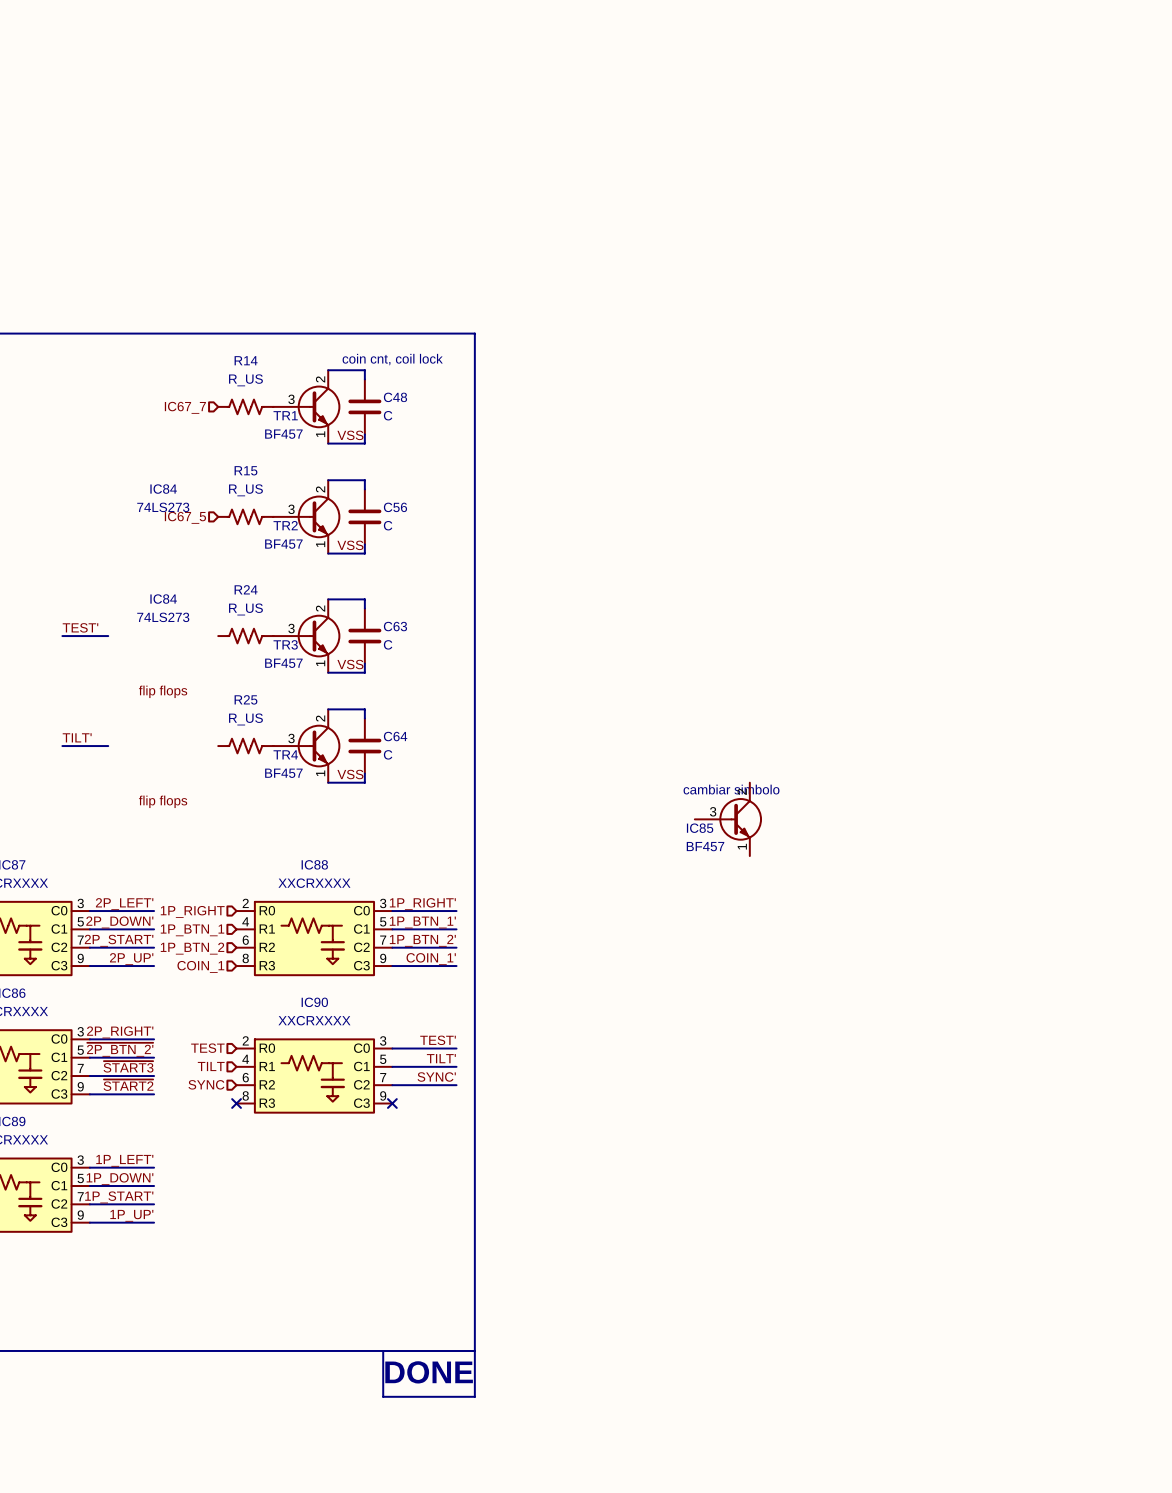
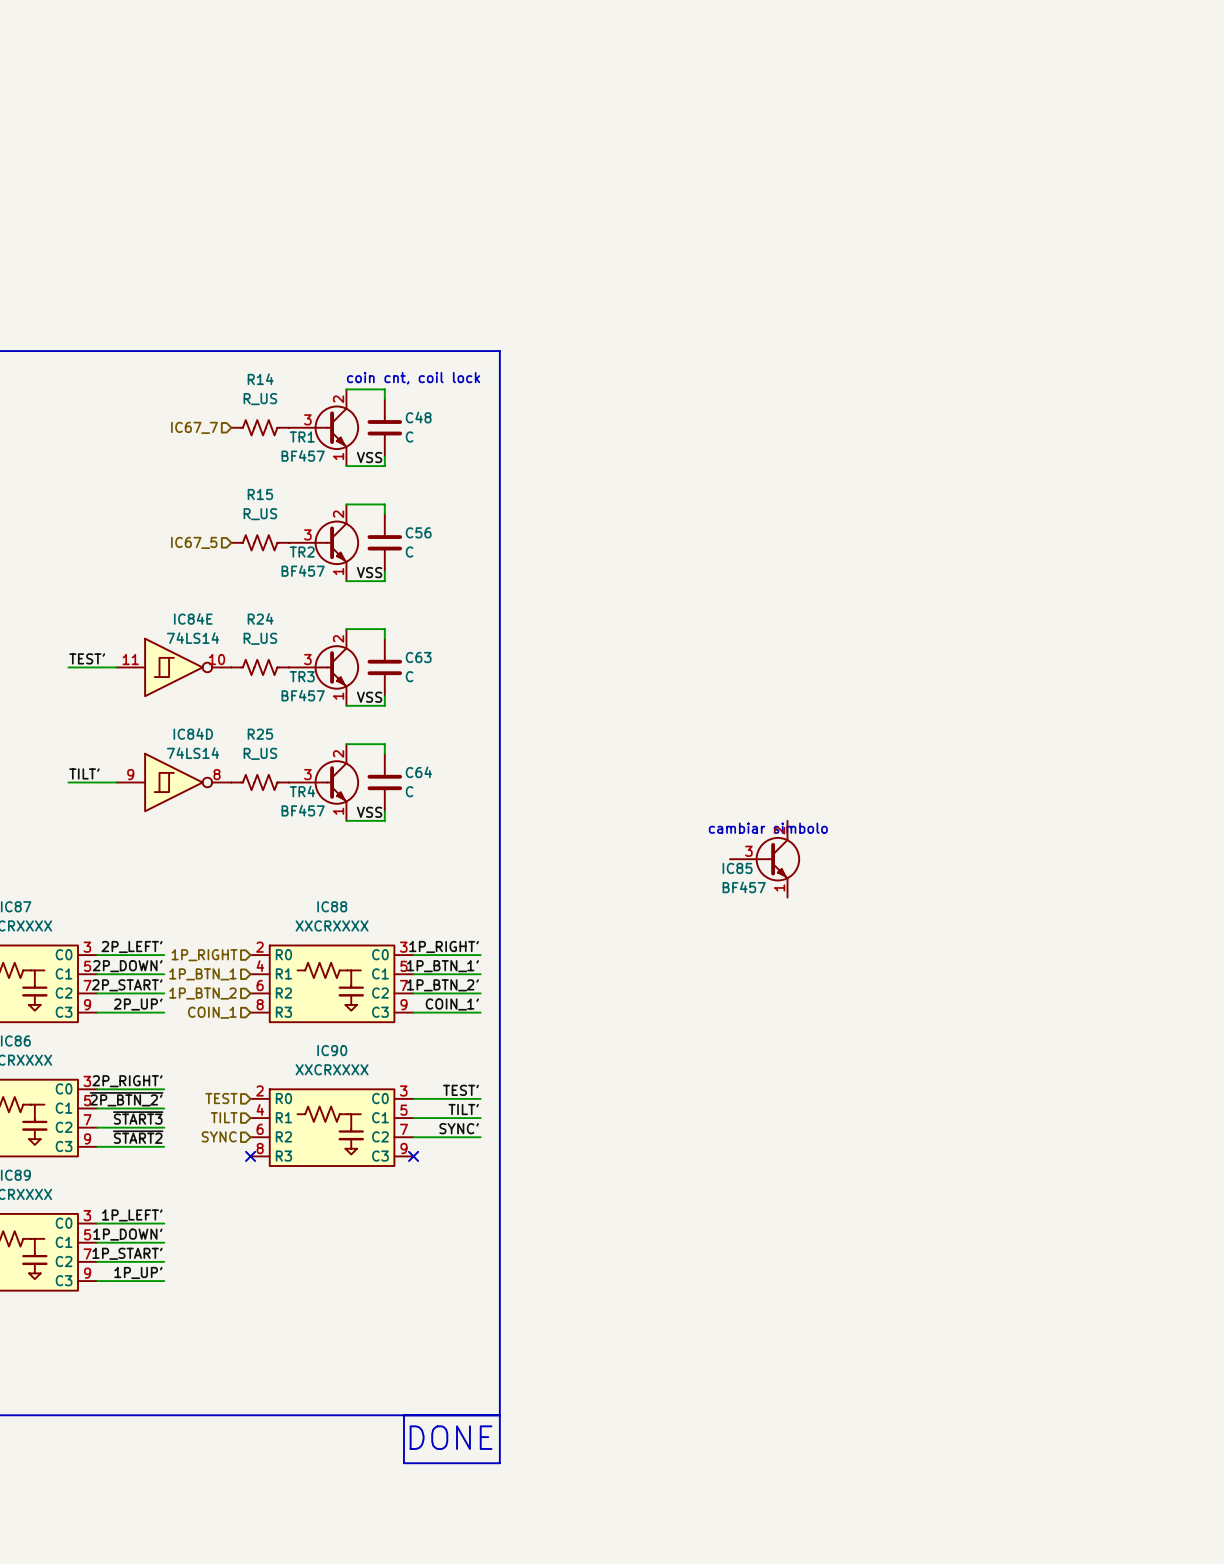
IC84: 74LS273 (163, 591) -> none
IC84E: none -> 74LS14 (173, 667)
IC84: 74LS273 (163, 701) -> none
IC84D: none -> 74LS14 (173, 782)

